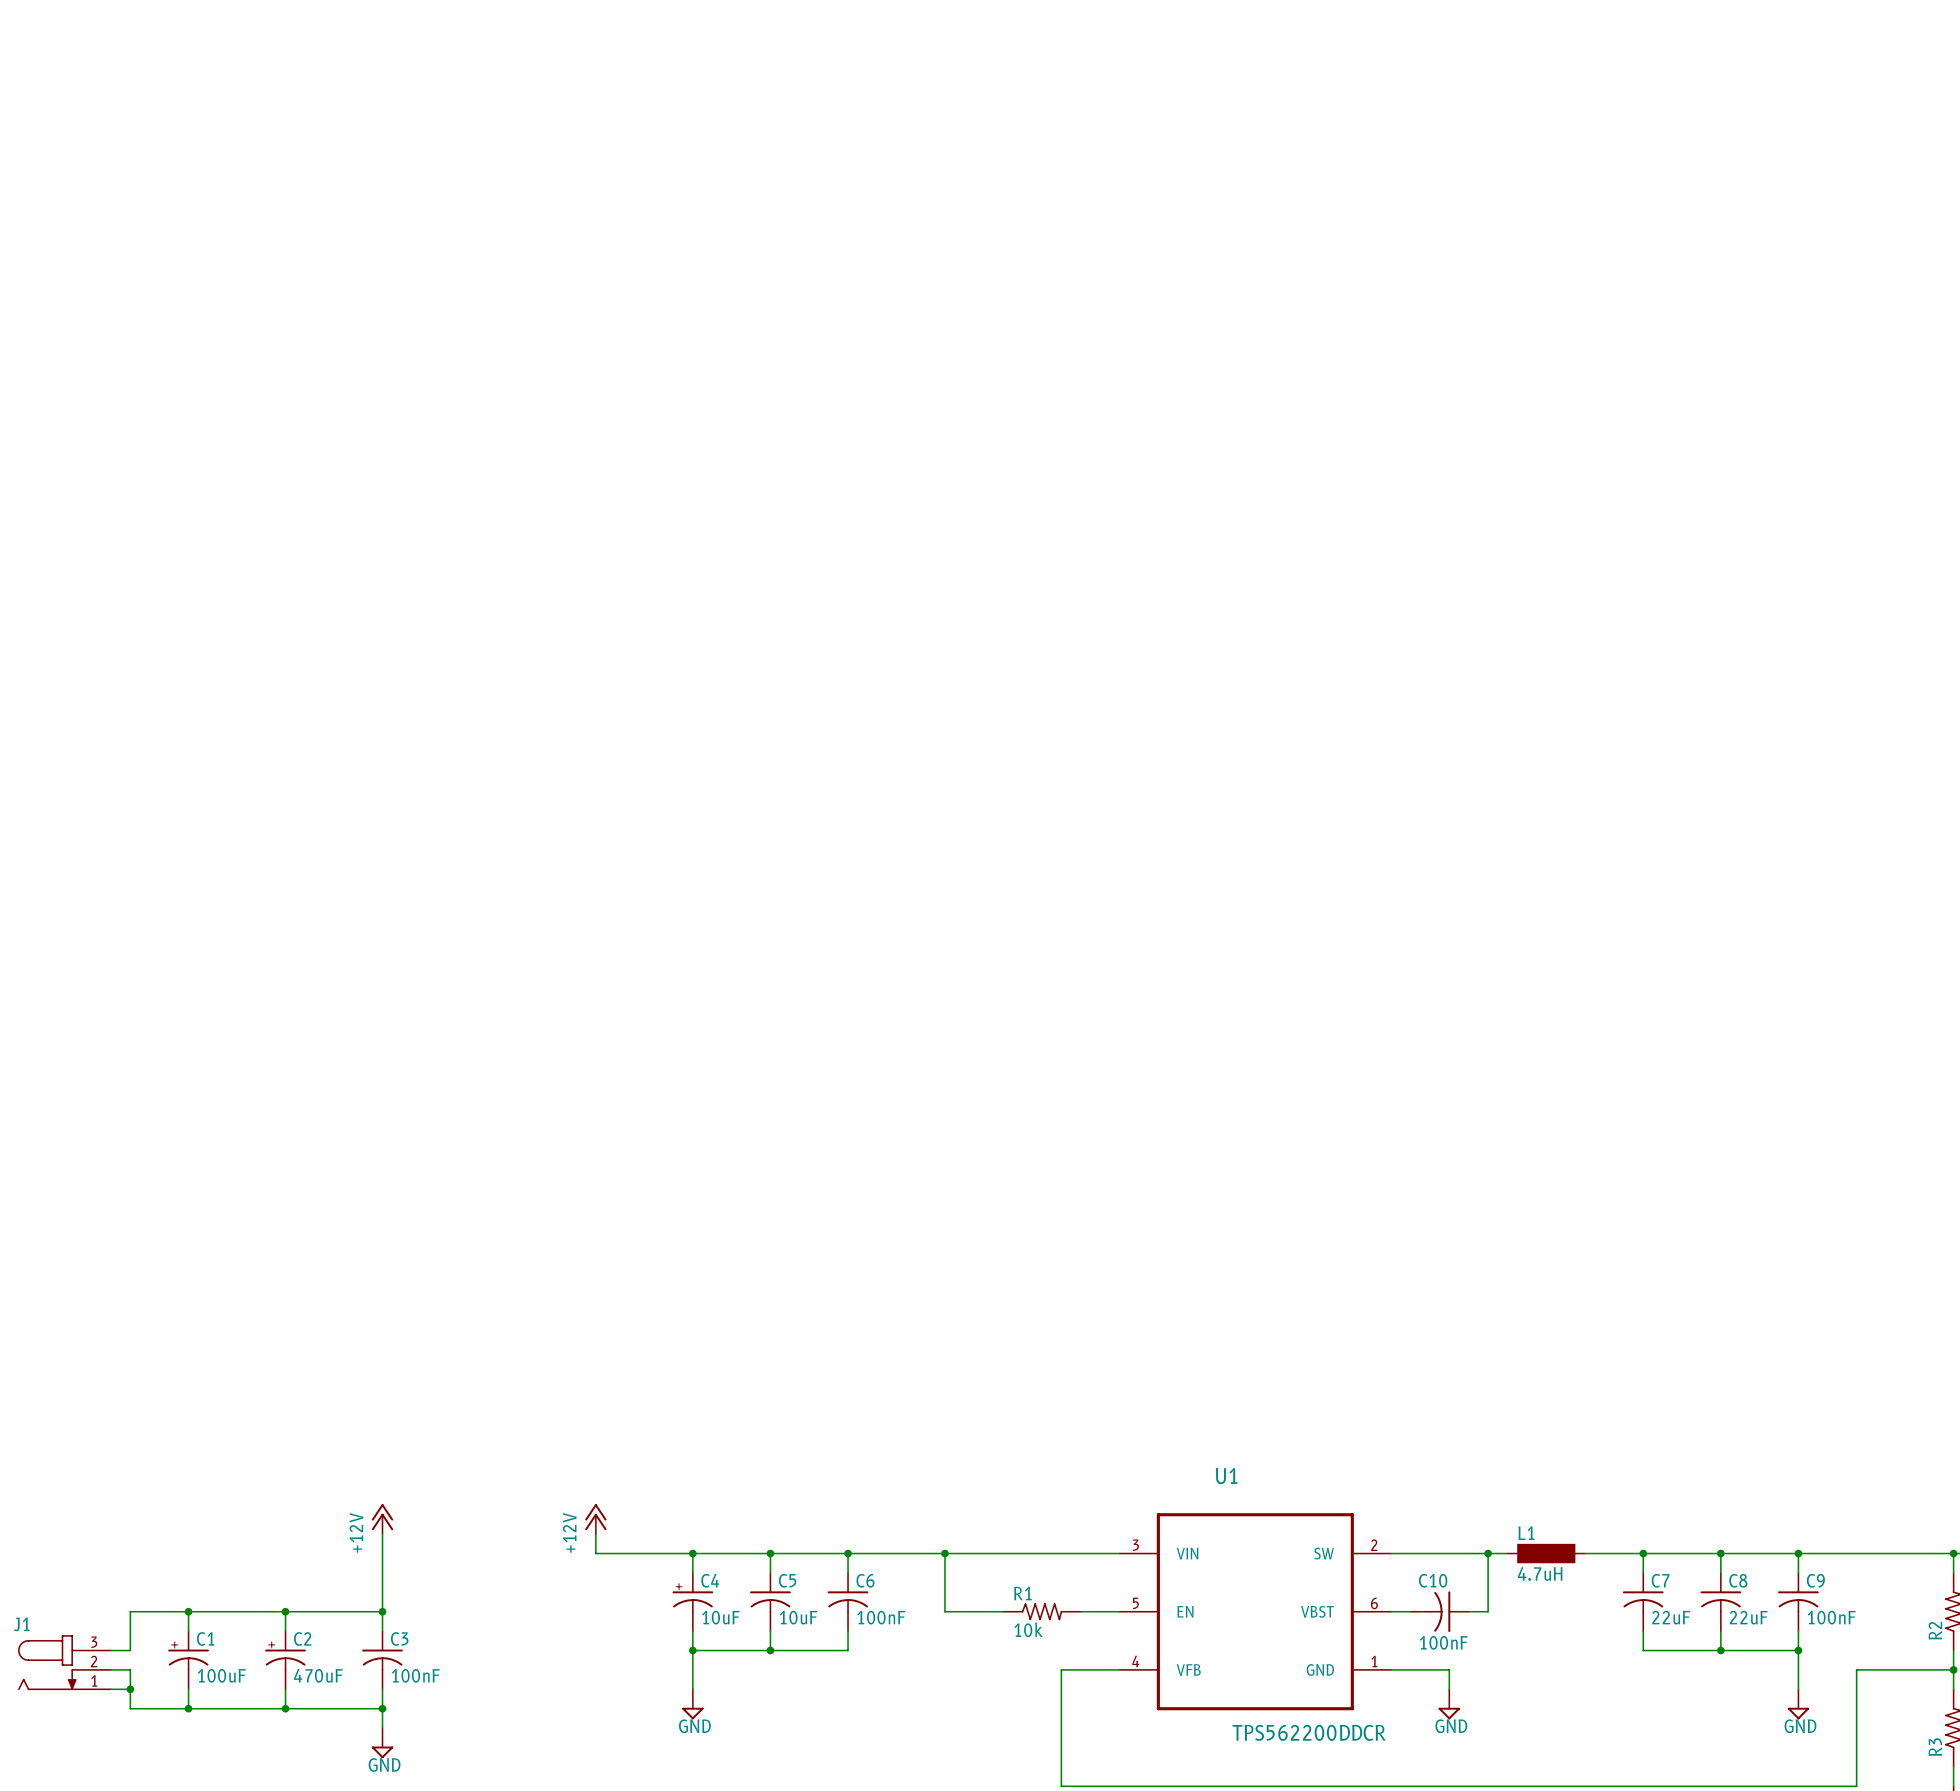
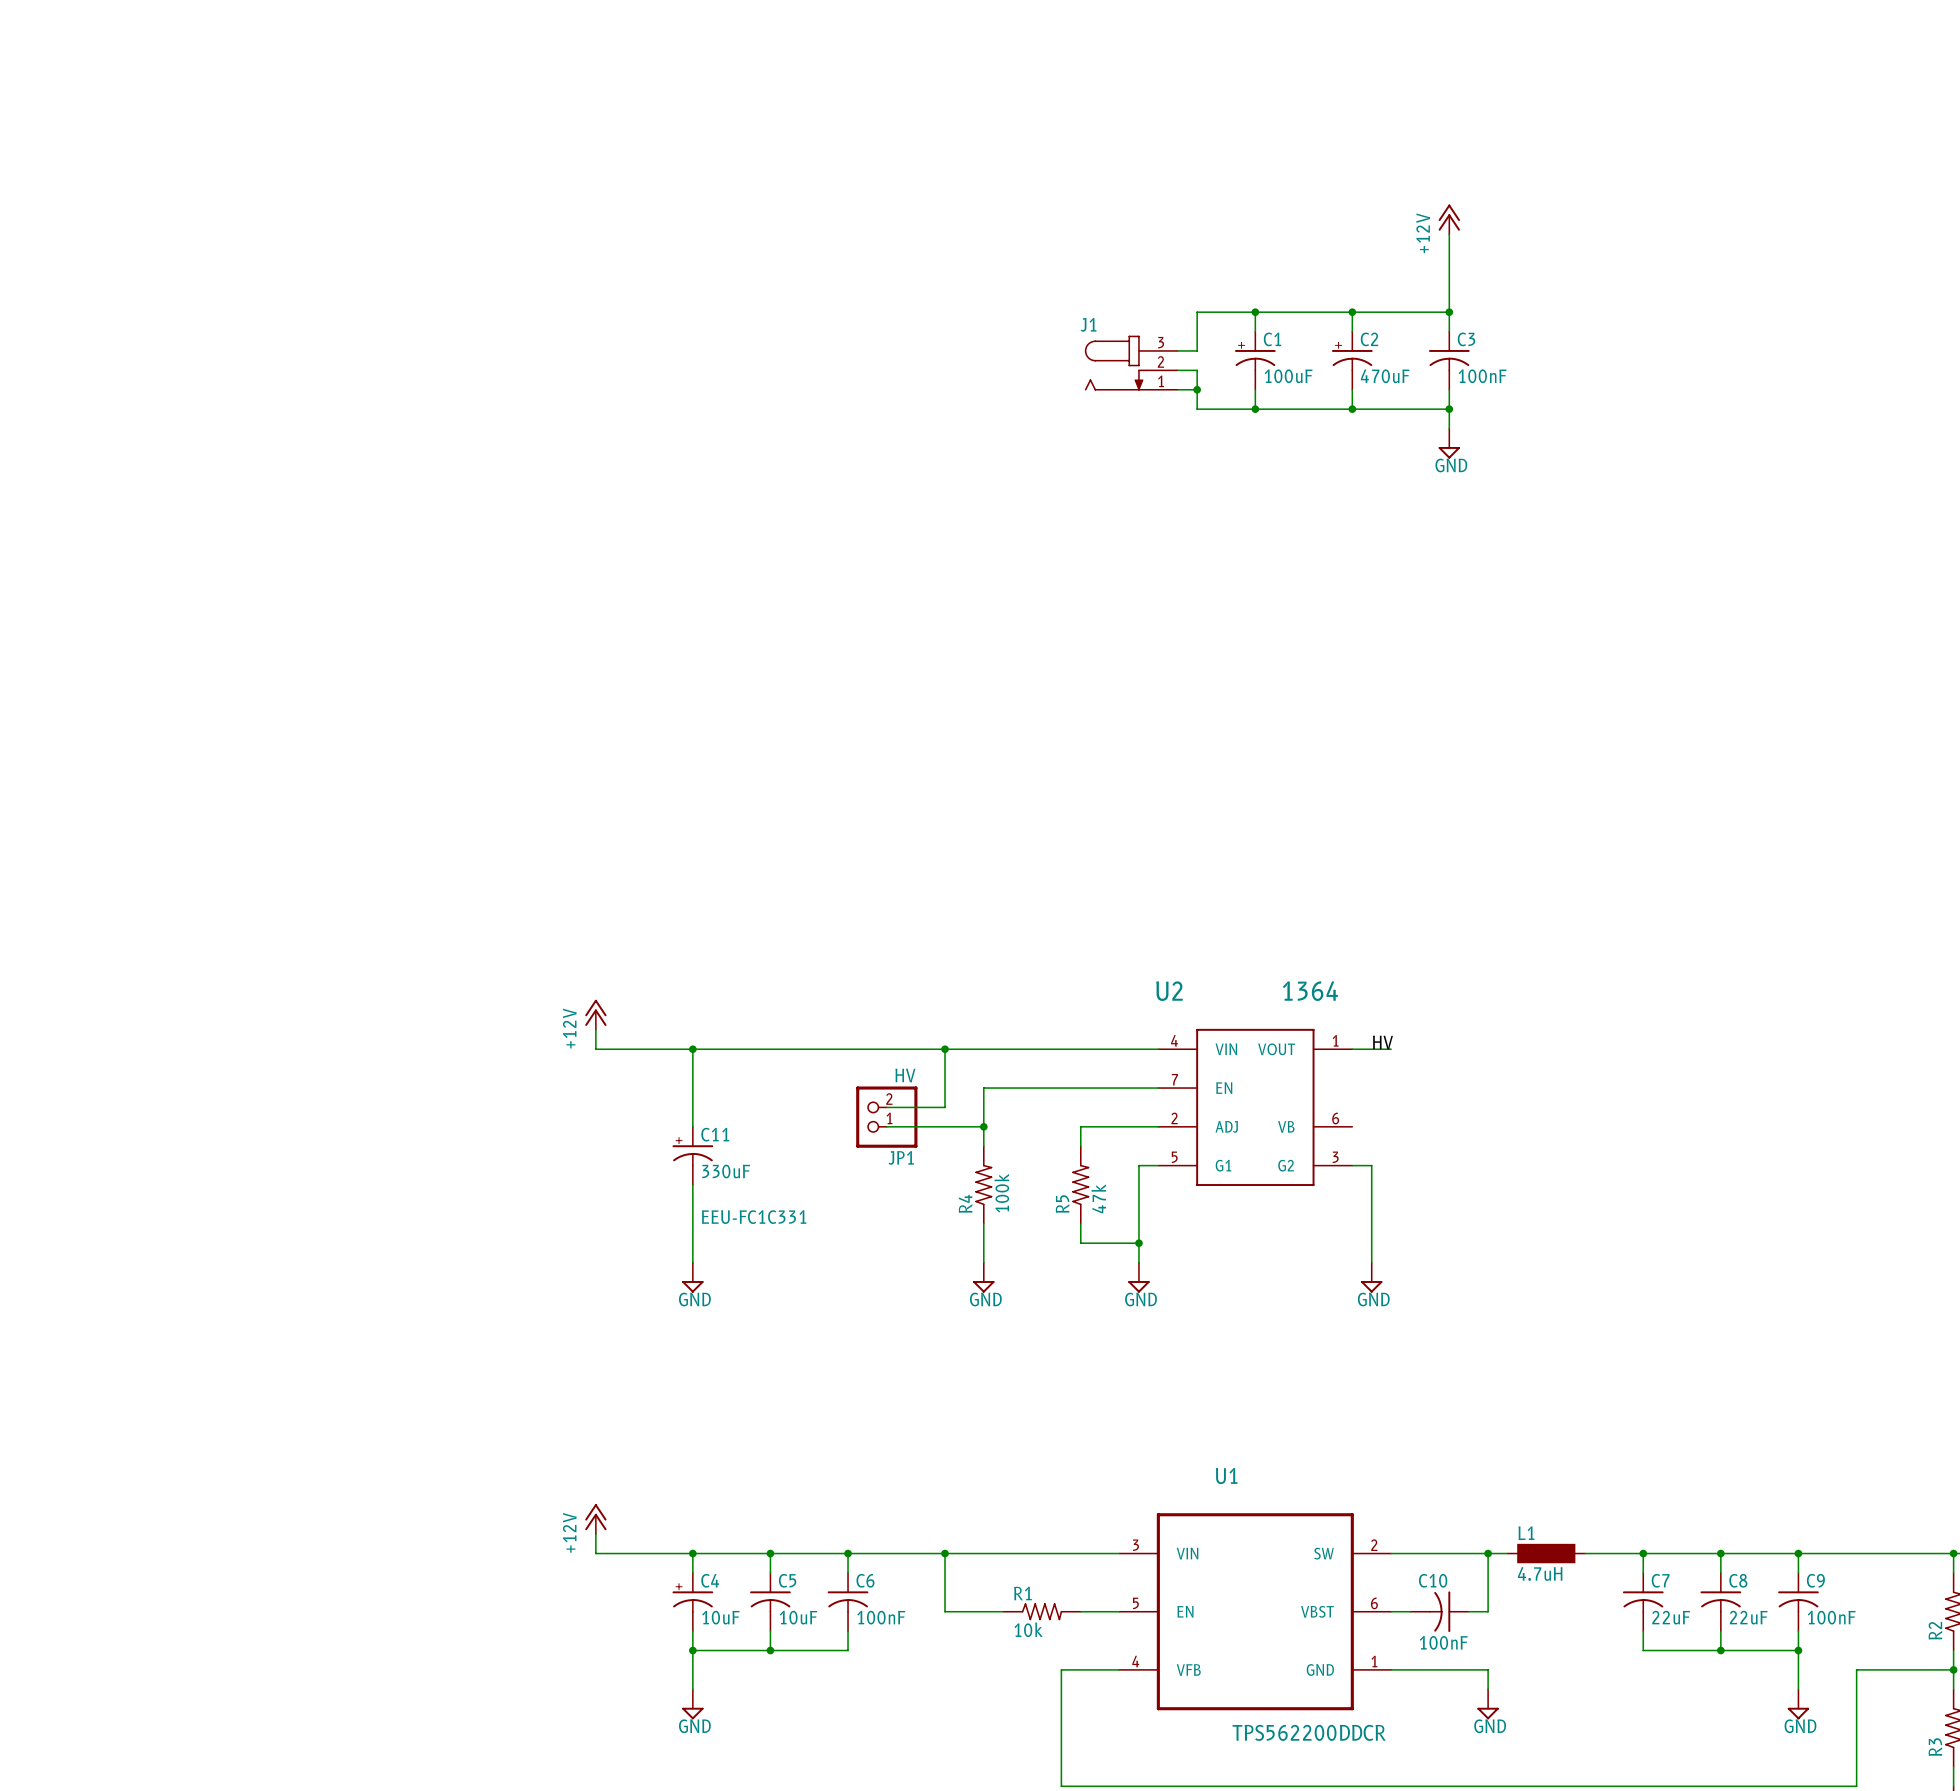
power symbol: none -> +12V (1449, 219)
wire: none -> (1449, 234) (1449, 331)
wire: none -> (1255, 312) (1255, 331)
junction: none -> (1255, 312)
wire: none -> (1352, 312) (1352, 331)
junction: none -> (1352, 312)
wire: none -> (1449, 312) (1197, 312) (1197, 350) (1177, 350)
junction: none -> (1449, 312)
wire: none -> (1177, 370) (1197, 370) (1197, 409) (1449, 409)
wire: none -> (1177, 389) (1197, 389)
junction: none -> (1197, 389)
wire: none -> (1255, 389) (1255, 409)
wire: none -> (1352, 389) (1352, 409)
wire: none -> (1449, 389) (1449, 428)
junction: none -> (1255, 409)
junction: none -> (1352, 409)
junction: none -> (1449, 409)
power symbol: none -> GND (1449, 443)
power symbol: none -> +12V (595, 1014)
wire: none -> (595, 1029) (595, 1049) (1158, 1049)
label: none -> HV (1382, 1042)
wire: none -> (692, 1049) (692, 1126)
junction: none -> (692, 1049)
wire: none -> (945, 1049) (945, 1107) (886, 1107)
junction: none -> (945, 1049)
wire: none -> (1352, 1049) (1391, 1049)
wire: none -> (1158, 1088) (983, 1088) (983, 1146)
U2: none -> 1364 (1255, 1107)
JP1: none -> HV (886, 1117)
wire: none -> (886, 1126) (983, 1126)
junction: none -> (983, 1126)
wire: none -> (1158, 1126) (1080, 1126) (1080, 1146)
C11: none -> 330uF (692, 1155)
wire: none -> (1158, 1165) (1138, 1165) (1138, 1262)
wire: none -> (1352, 1165) (1371, 1165) (1371, 1262)
wire: none -> (692, 1185) (692, 1262)
R4: none -> 100k (983, 1185)
R5: none -> 47k (1080, 1185)
text: none -> EEU-FC1C331 (754, 1217)
wire: none -> (983, 1223) (983, 1262)
wire: none -> (1080, 1223) (1080, 1243) (1138, 1243)
junction: none -> (1138, 1243)
power symbol: none -> GND (692, 1277)
power symbol: none -> GND (983, 1277)
power symbol: none -> GND (1138, 1277)
power symbol: none -> GND (1371, 1277)
power symbol: +12V (382, 1519) -> none
wire: (382, 1534) (382, 1631) -> none
wire: (188, 1611) (188, 1631) -> none
junction: (188, 1611) -> none
wire: (285, 1611) (285, 1631) -> none
junction: (285, 1611) -> none
wire: (382, 1611) (130, 1611) (130, 1650) (110, 1650) -> none
junction: (382, 1611) -> none
C1 position: (188, 1660) -> (1255, 360)
C2 position: (285, 1660) -> (1352, 360)
C3 position: (382, 1660) -> (1449, 360)
J1 position: (64, 1662) -> (1131, 363)
wire: (110, 1669) (130, 1669) (130, 1708) (382, 1708) -> none
wire: (1449, 1669) (1449, 1689) -> (1449, 1669) (1488, 1669) (1488, 1689)
wire: (110, 1689) (130, 1689) -> none
junction: (130, 1689) -> none
wire: (188, 1689) (188, 1708) -> none
wire: (285, 1689) (285, 1708) -> none
wire: (382, 1689) (382, 1728) -> none
power symbol position: GND (1449, 1704) -> GND (1488, 1704)
junction: (188, 1708) -> none
junction: (285, 1708) -> none
junction: (382, 1708) -> none
power symbol: GND (382, 1743) -> none

